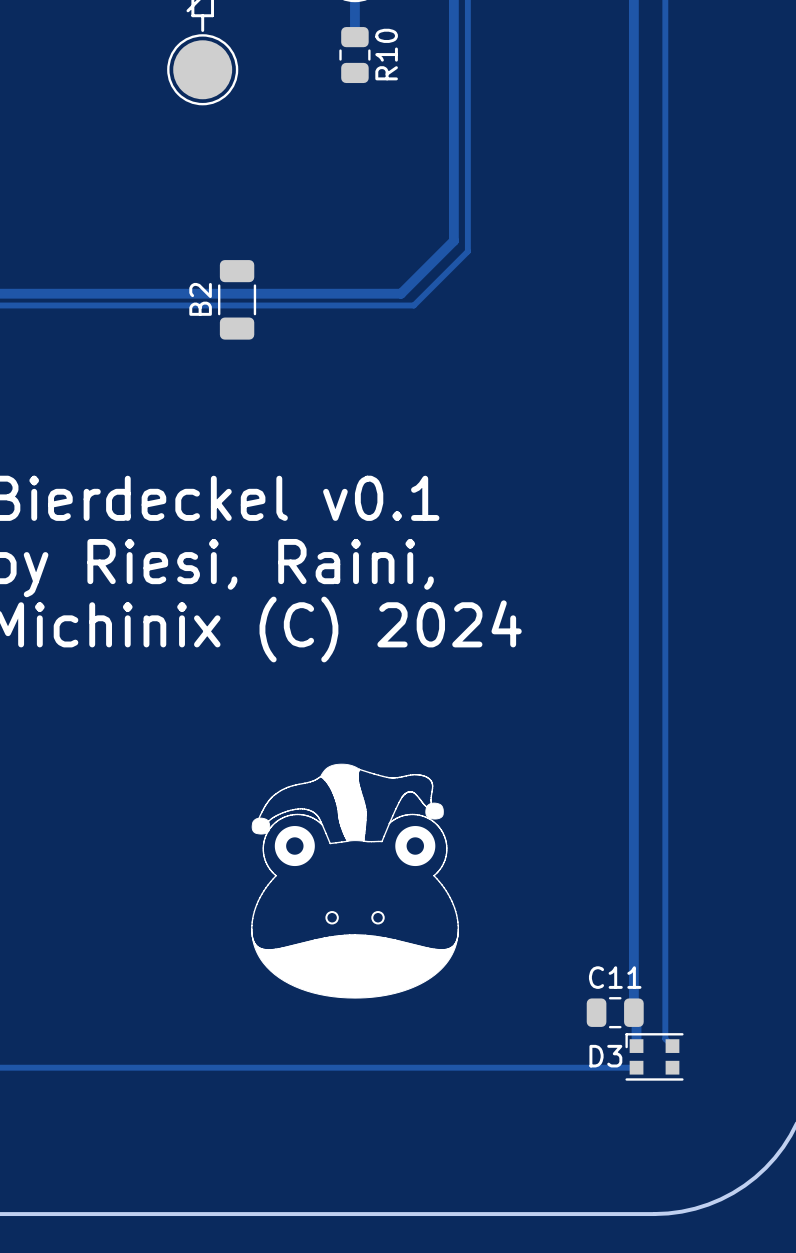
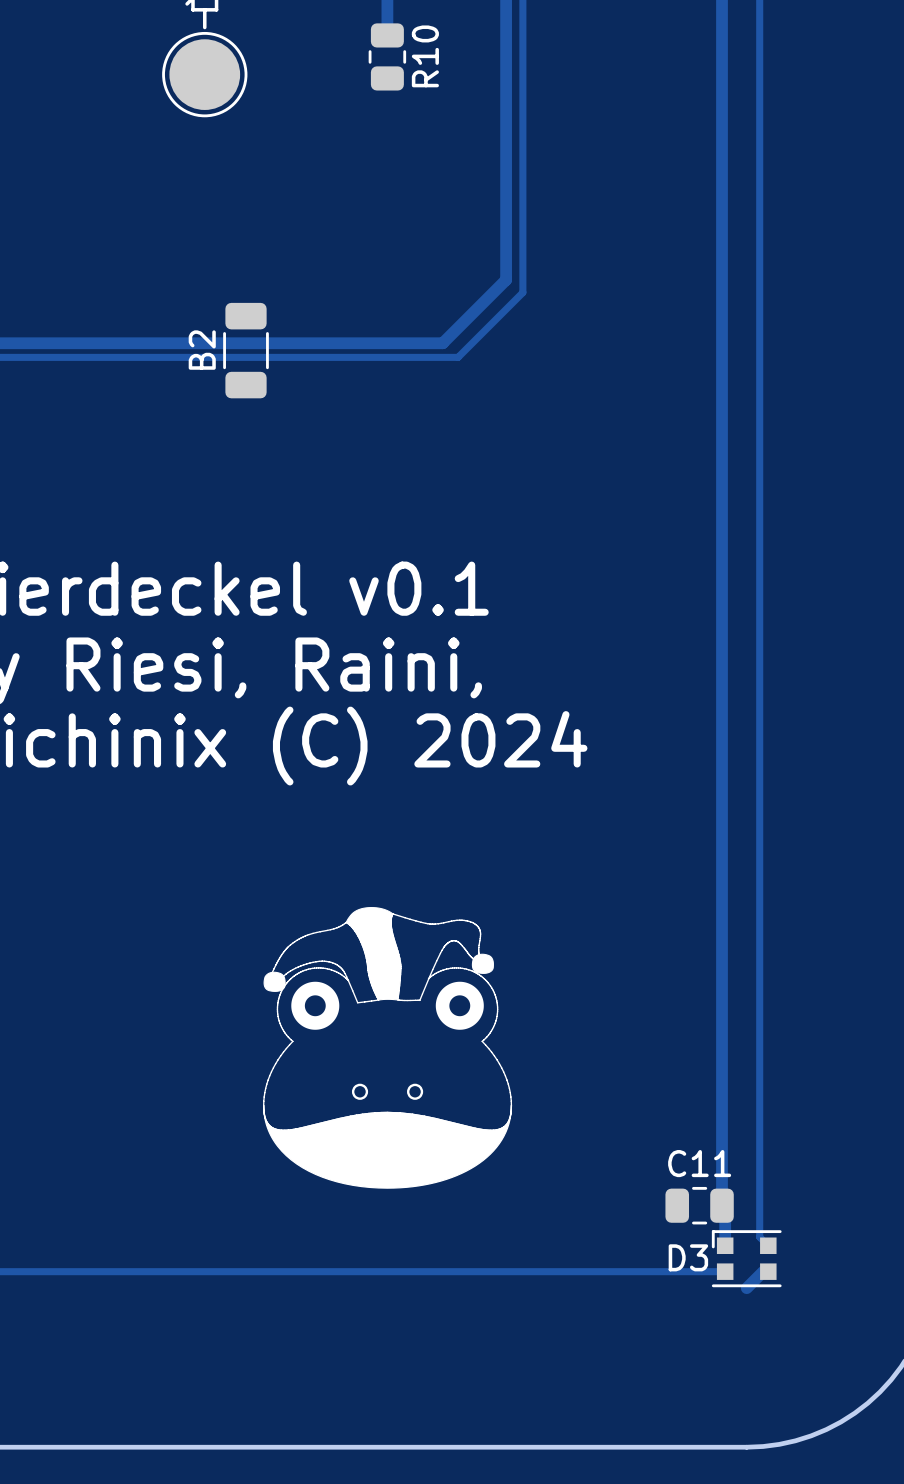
track: none -> (763, 1271) (746, 1288)

